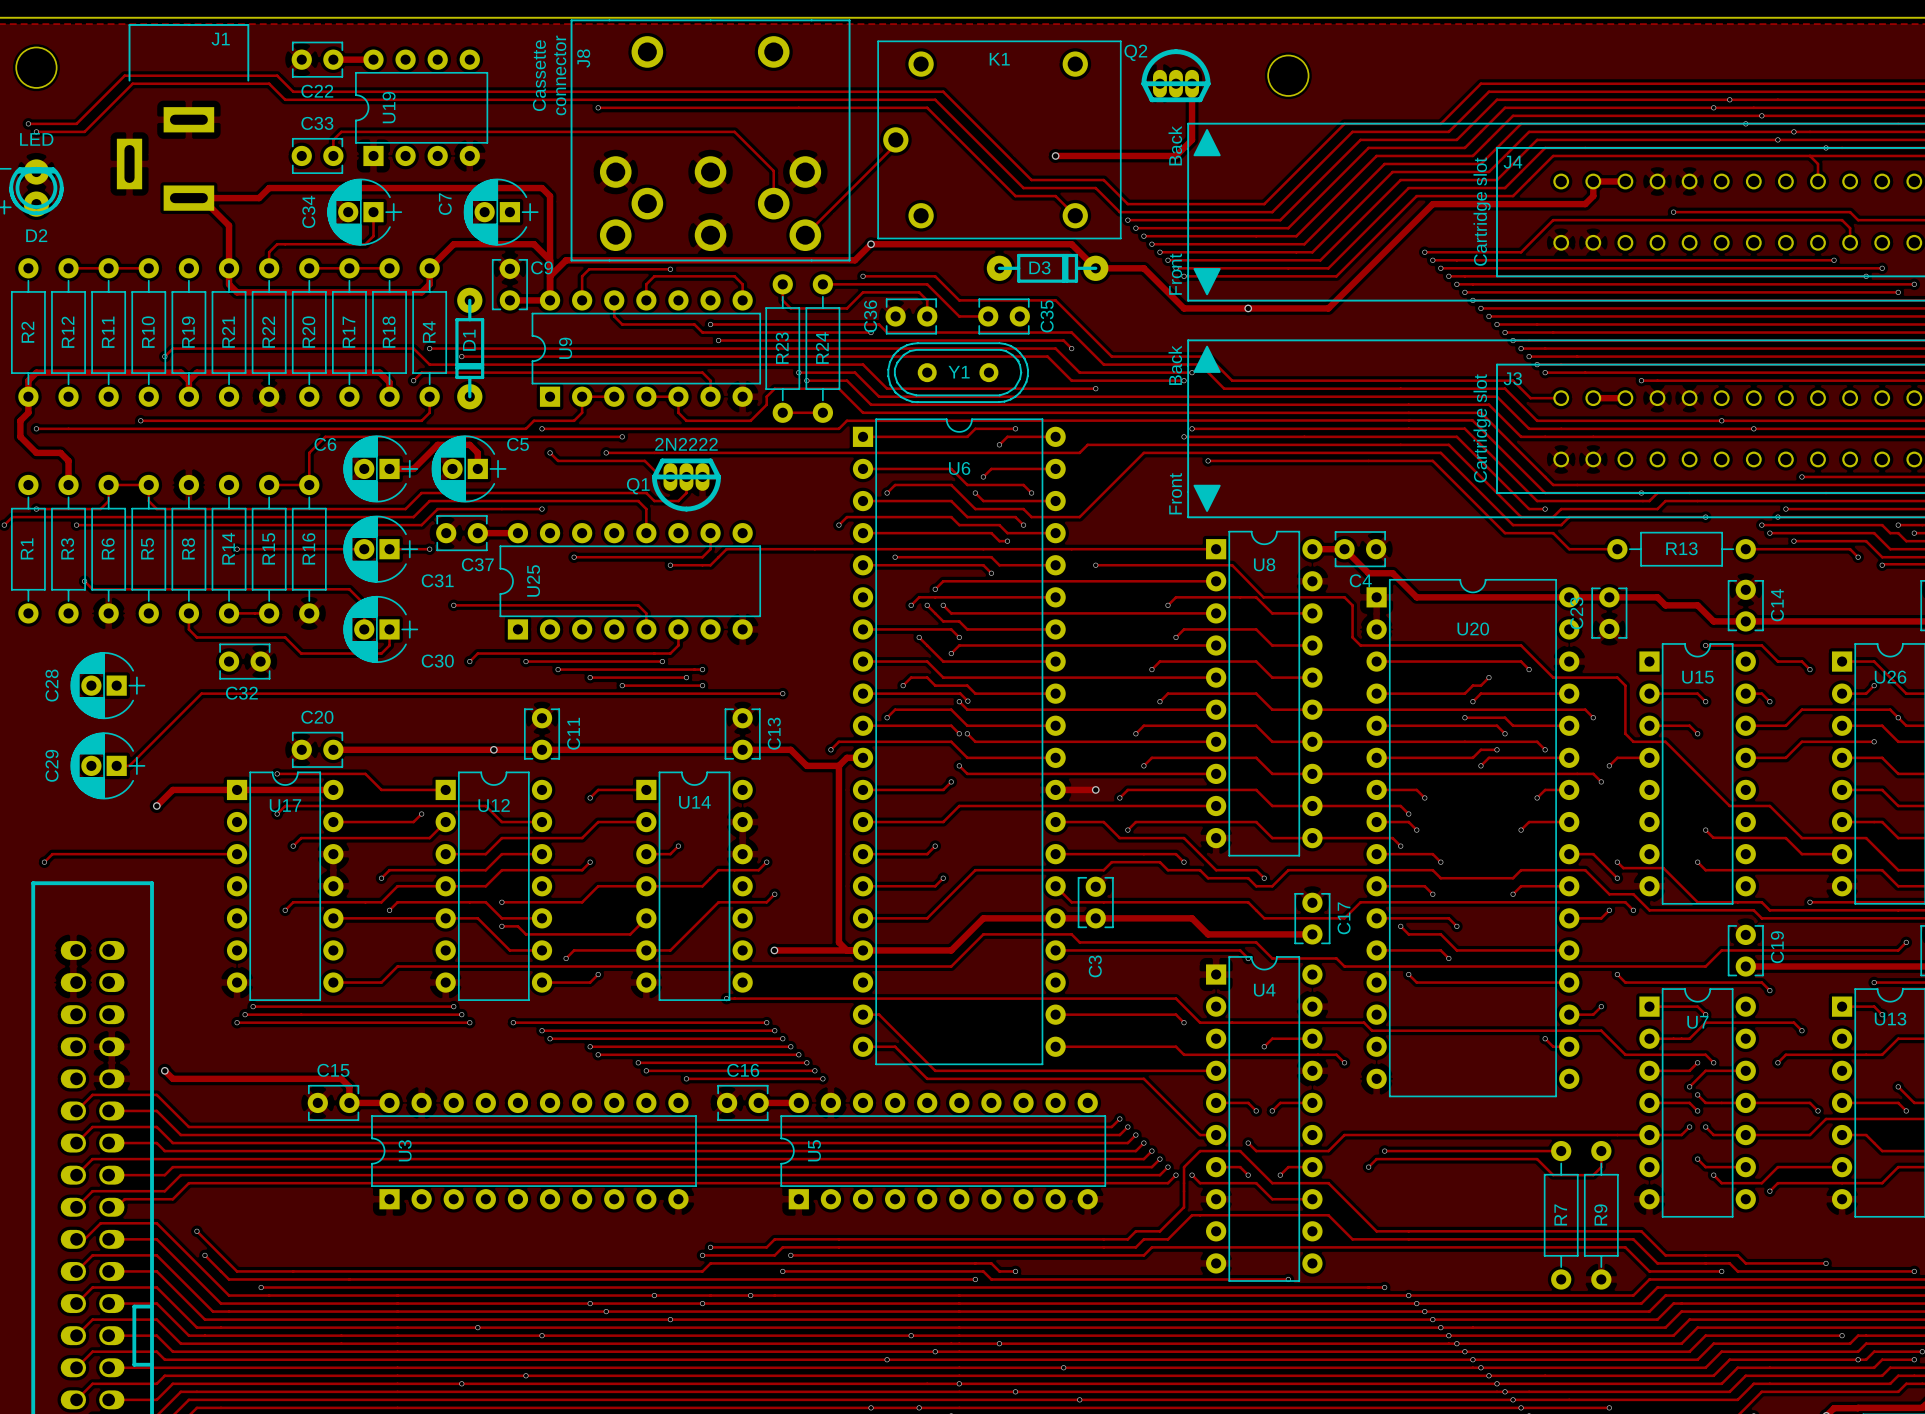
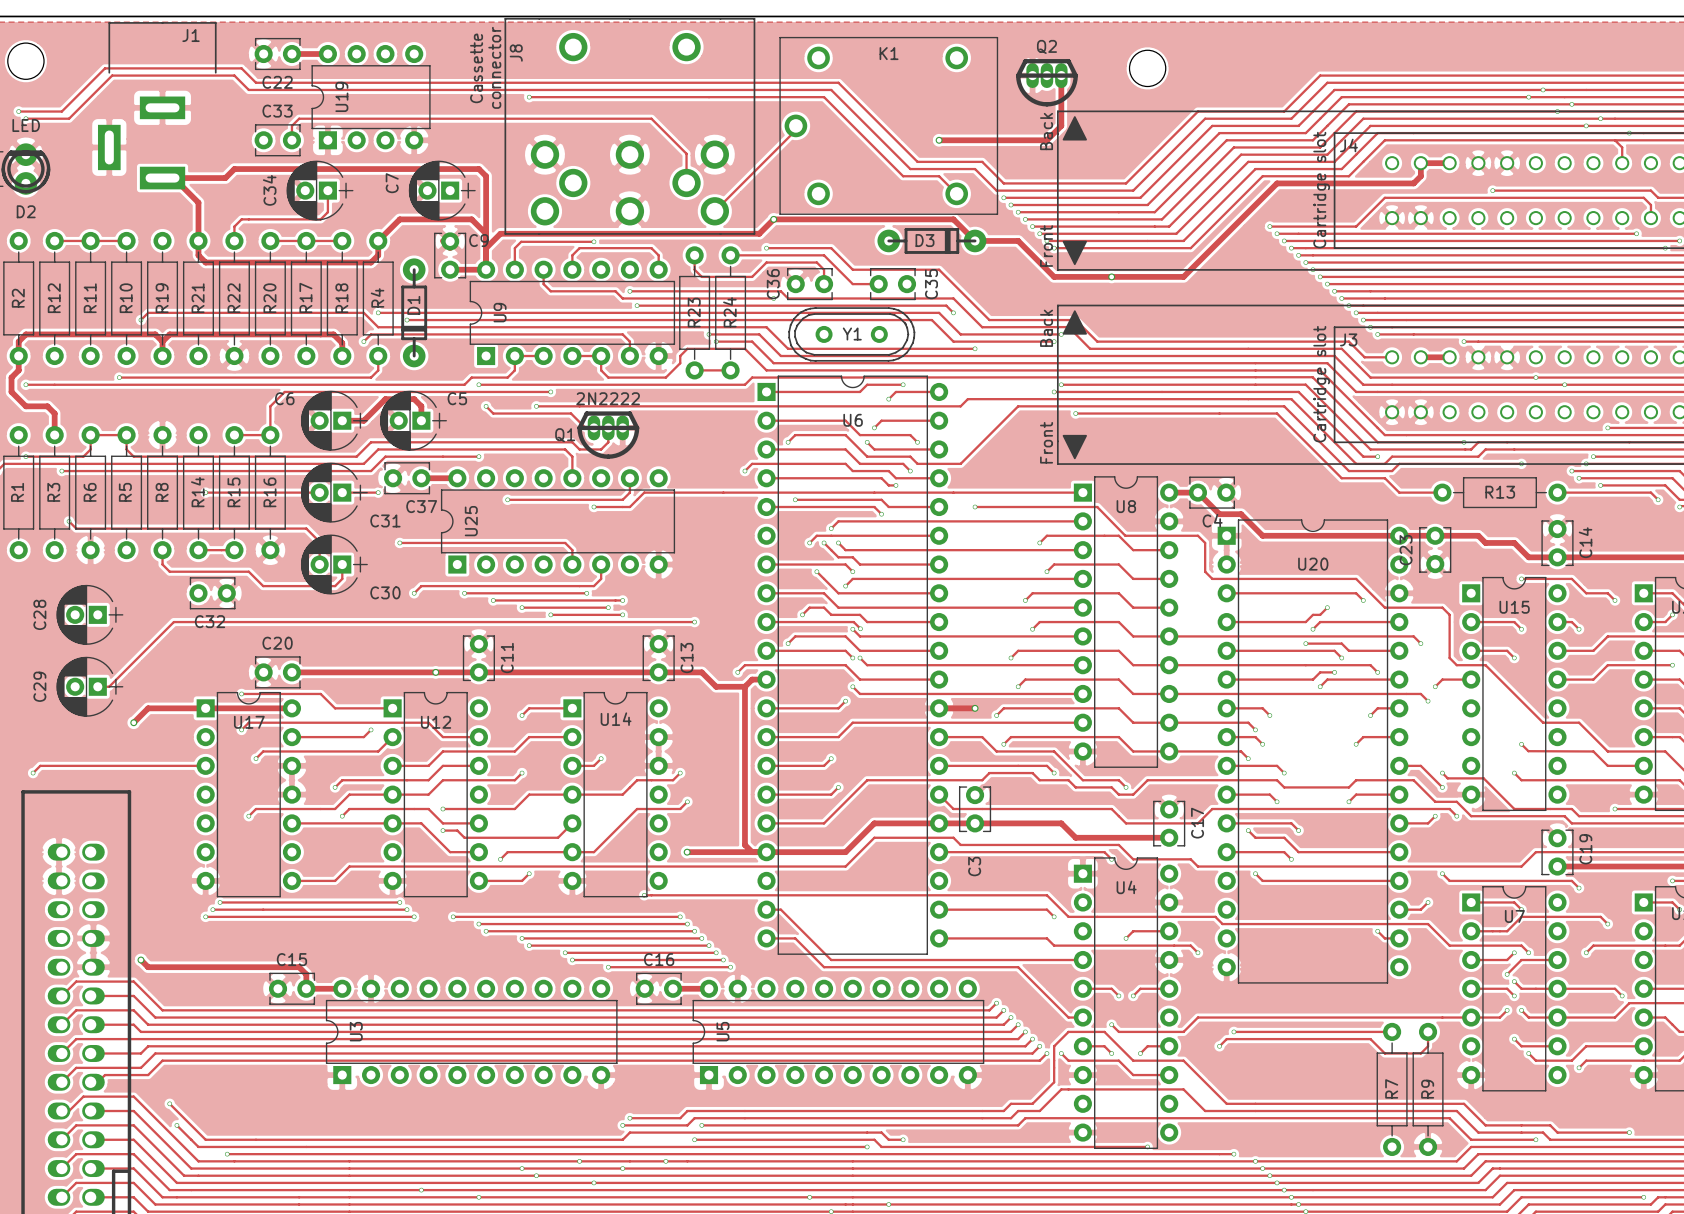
Q2 name position: Q2 (1135, 52) -> Q2 (1046, 46)
Q2 rotation: 0° (1176, 75) -> 180° (1046, 82)

